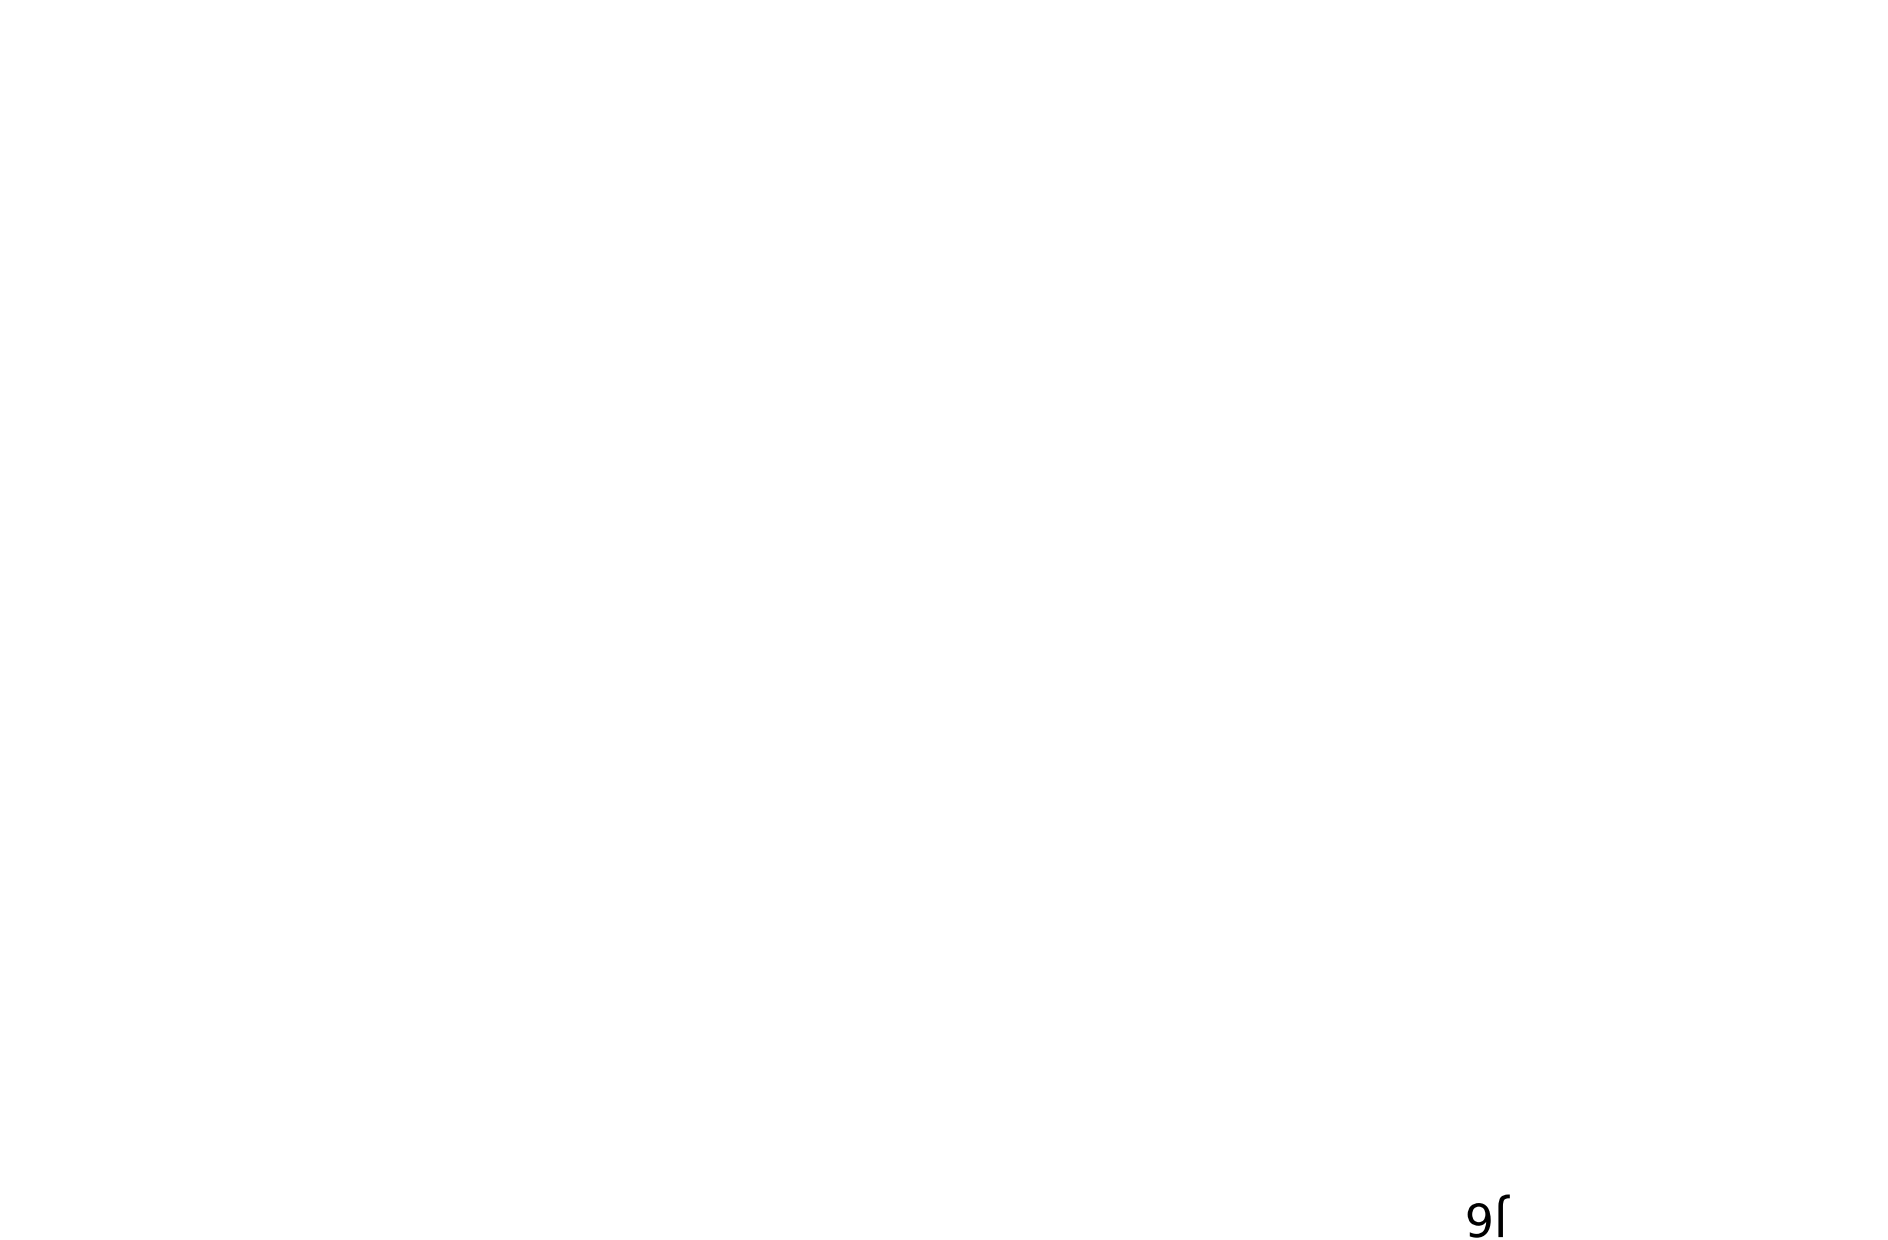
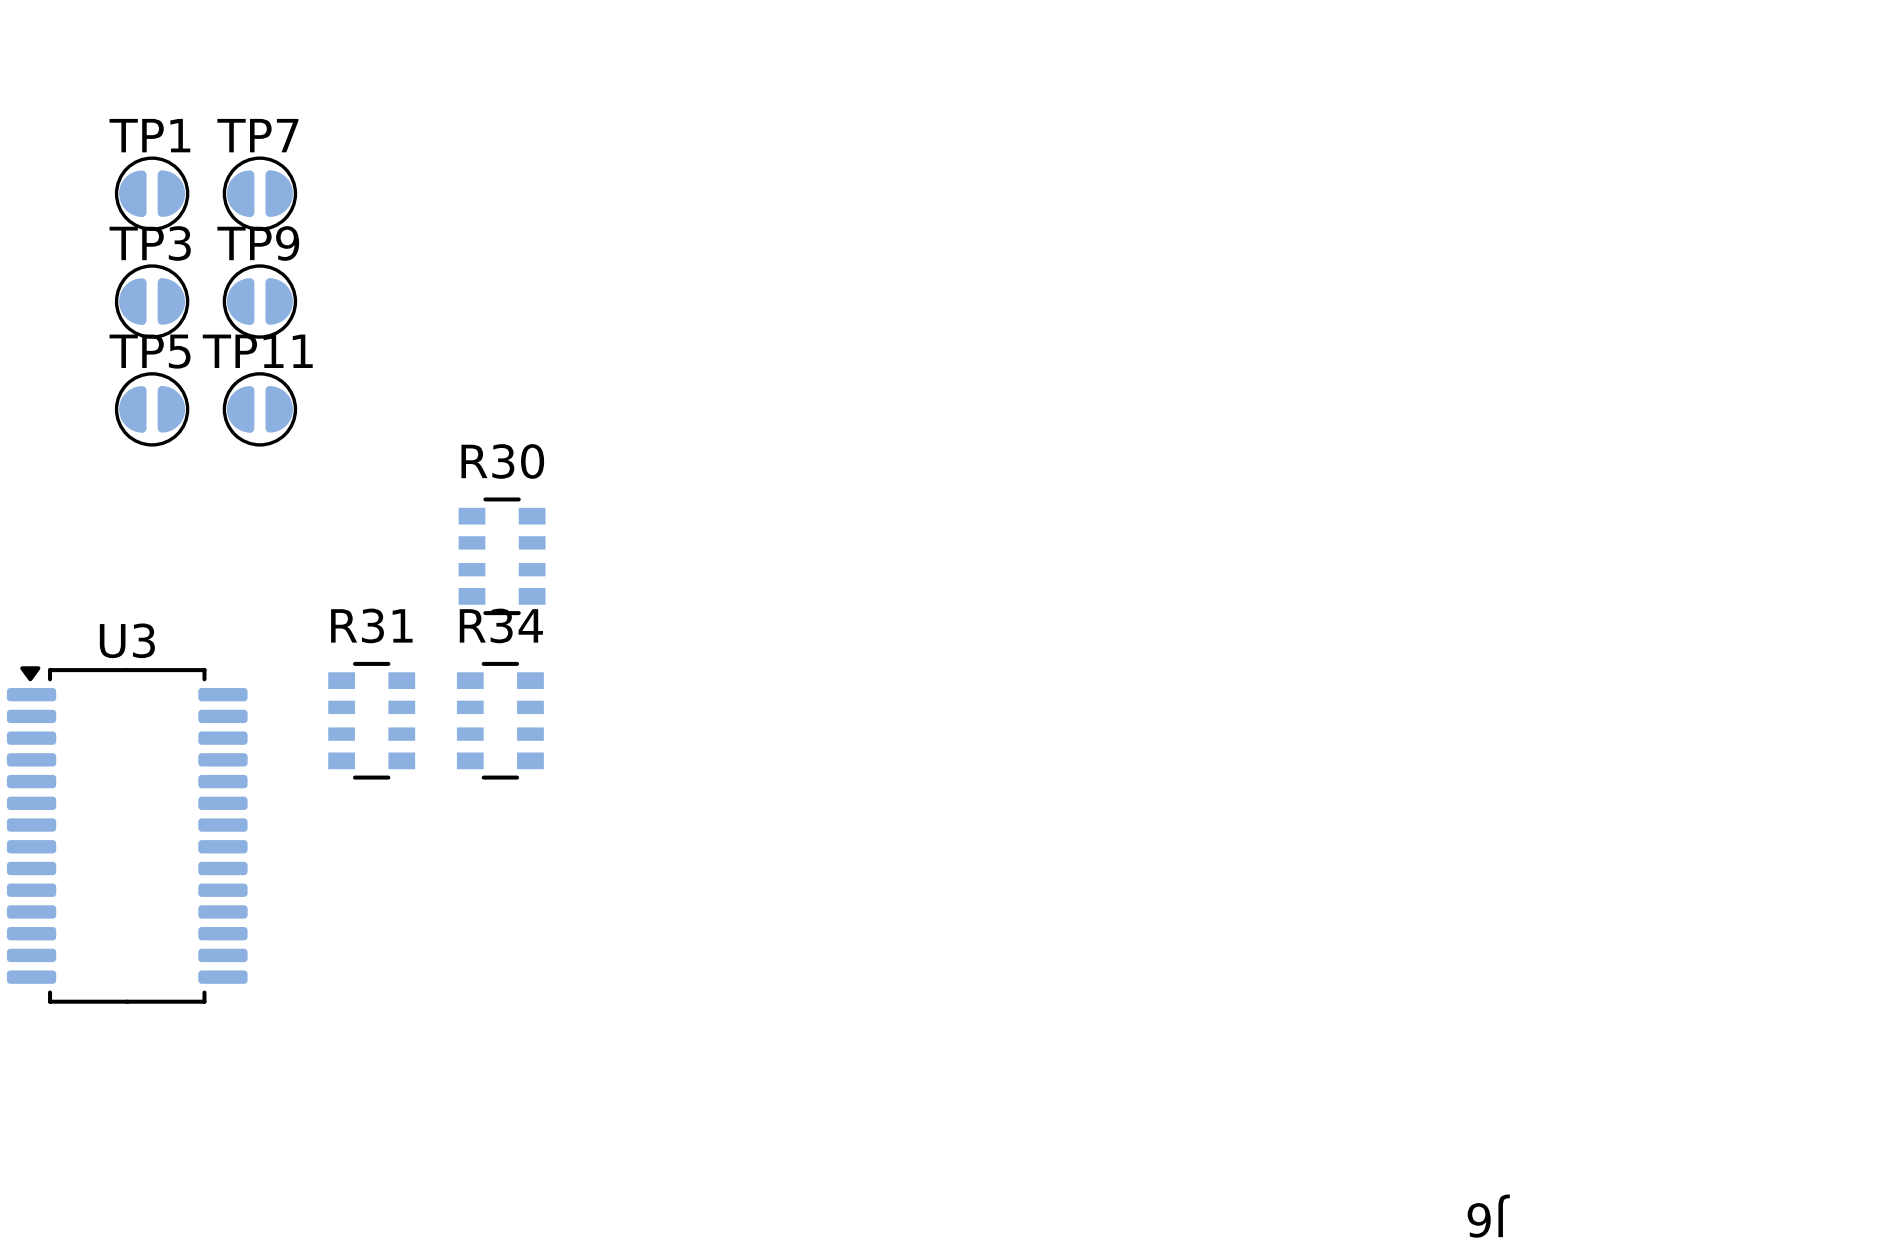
TP1: none -> (152, 193)
TP7: none -> (259, 193)
TP3: none -> (152, 301)
TP9: none -> (259, 301)
TP5: none -> (152, 409)
TP11: none -> (259, 409)
R30: none -> (502, 556)
R31: none -> (371, 720)
R34: none -> (500, 720)
U3: none -> (127, 834)

